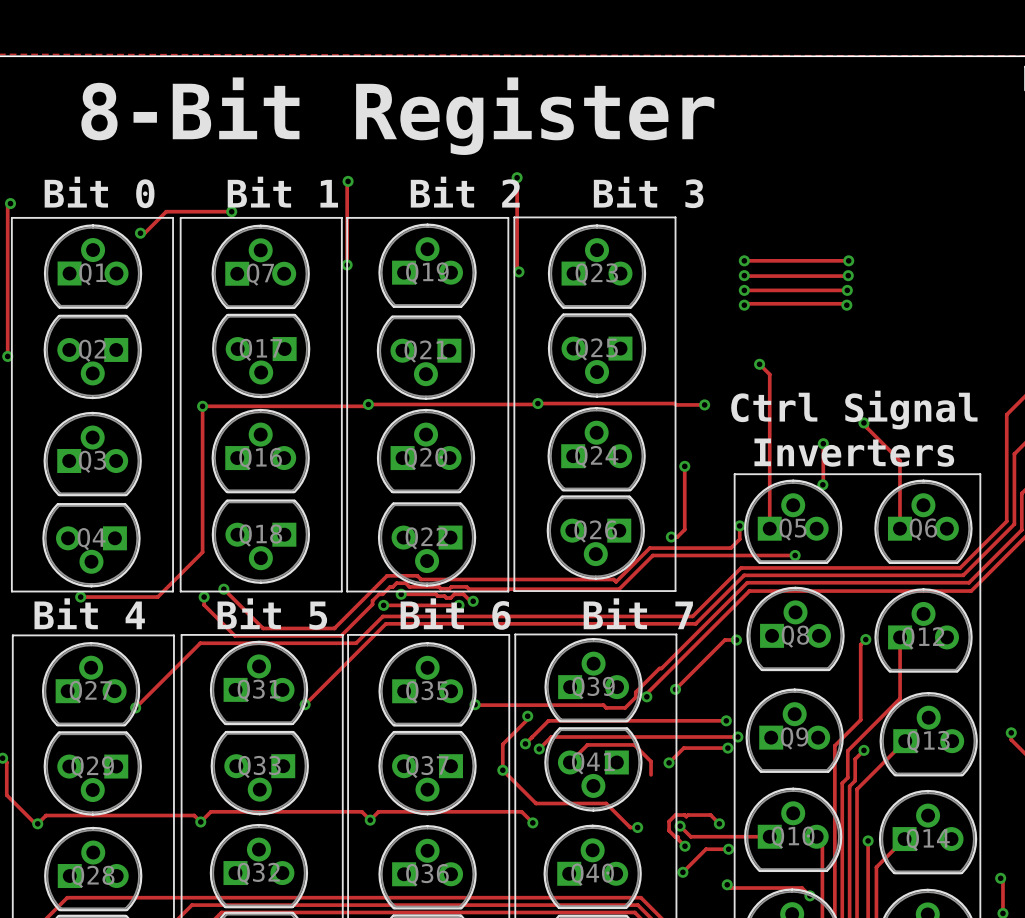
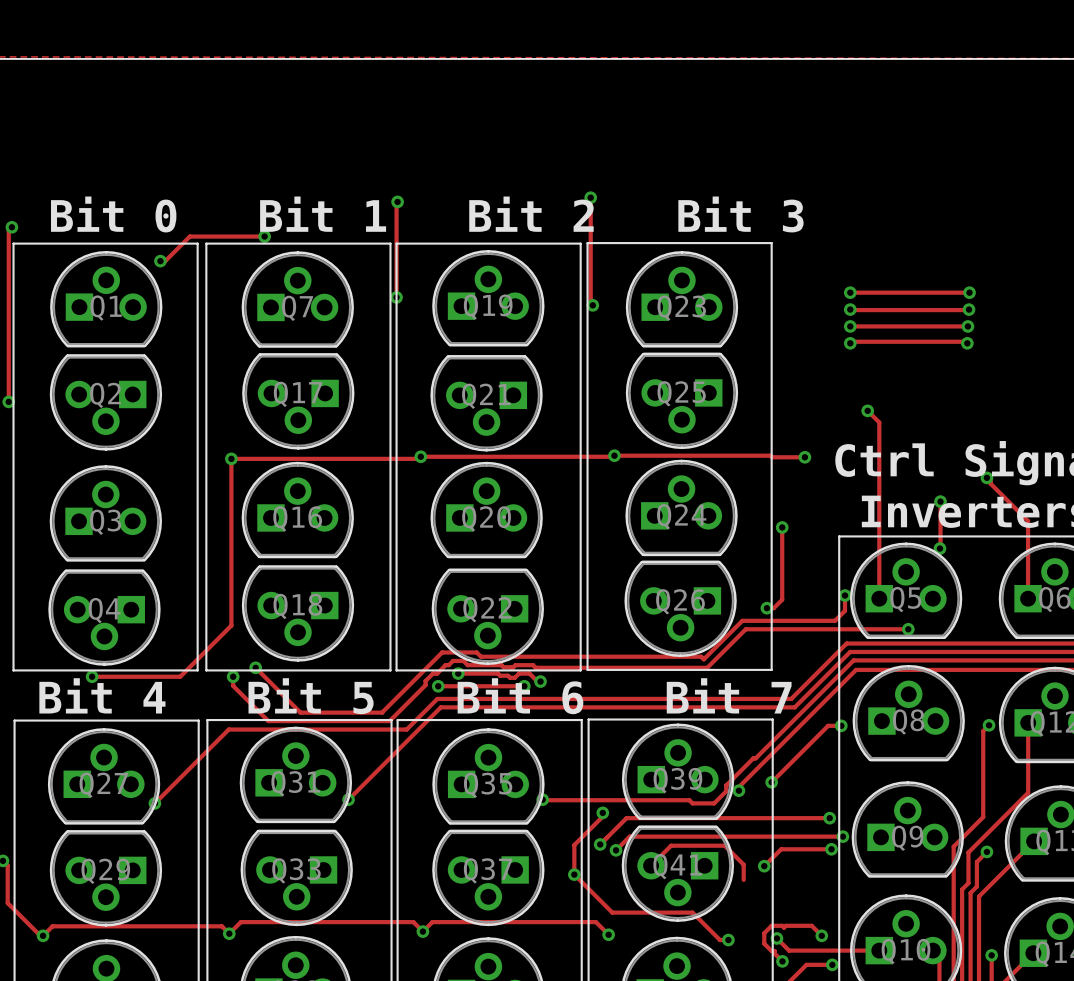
text: 8-Bit Register (397, 116) -> none

